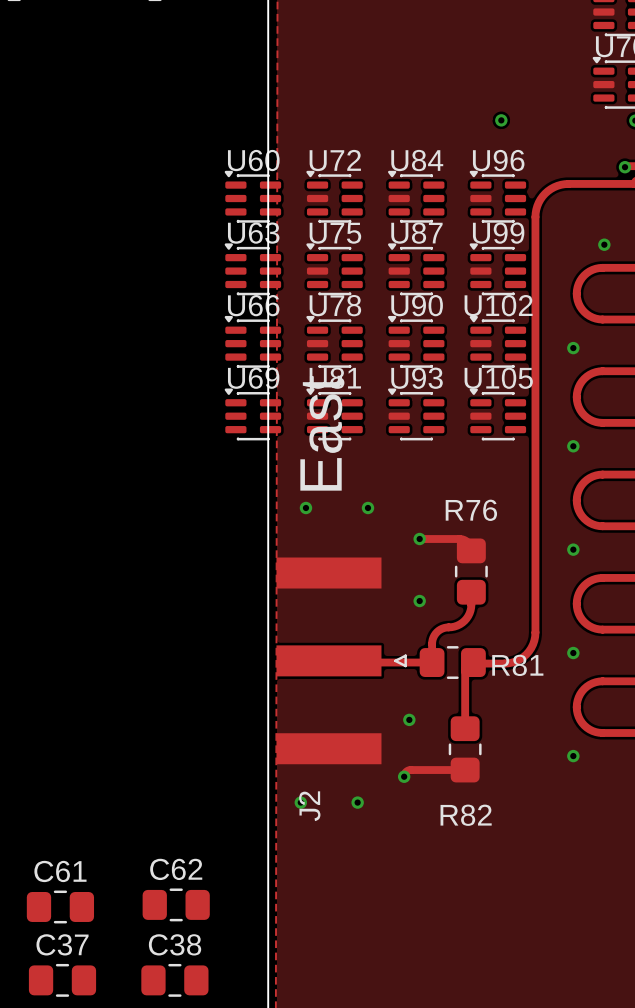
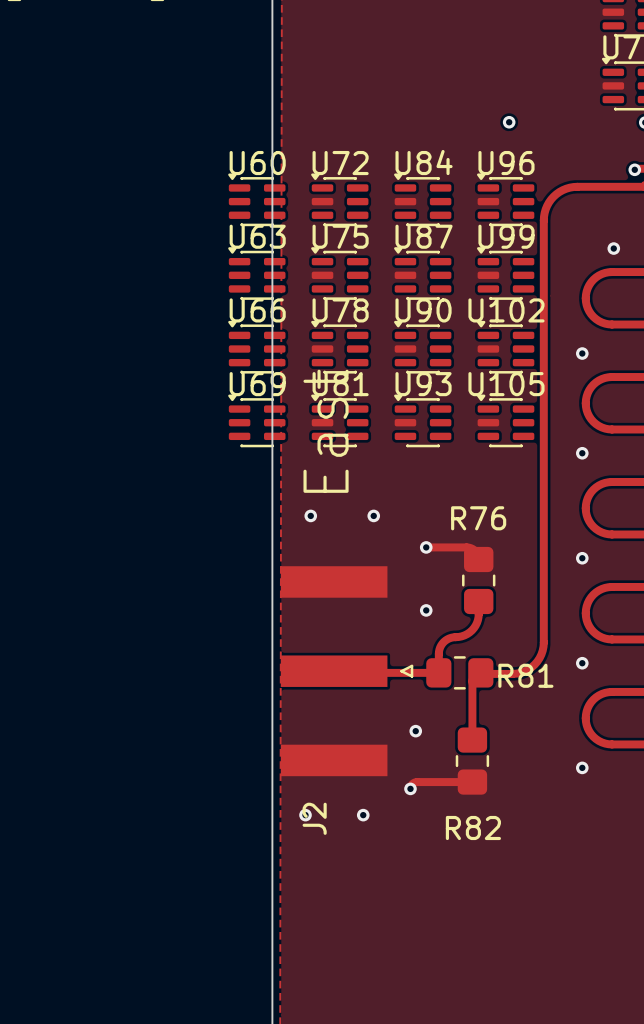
C62: (176, 904) -> none
C61: (60, 906) -> none
C37: (62, 980) -> none
C38: (174, 980) -> none

